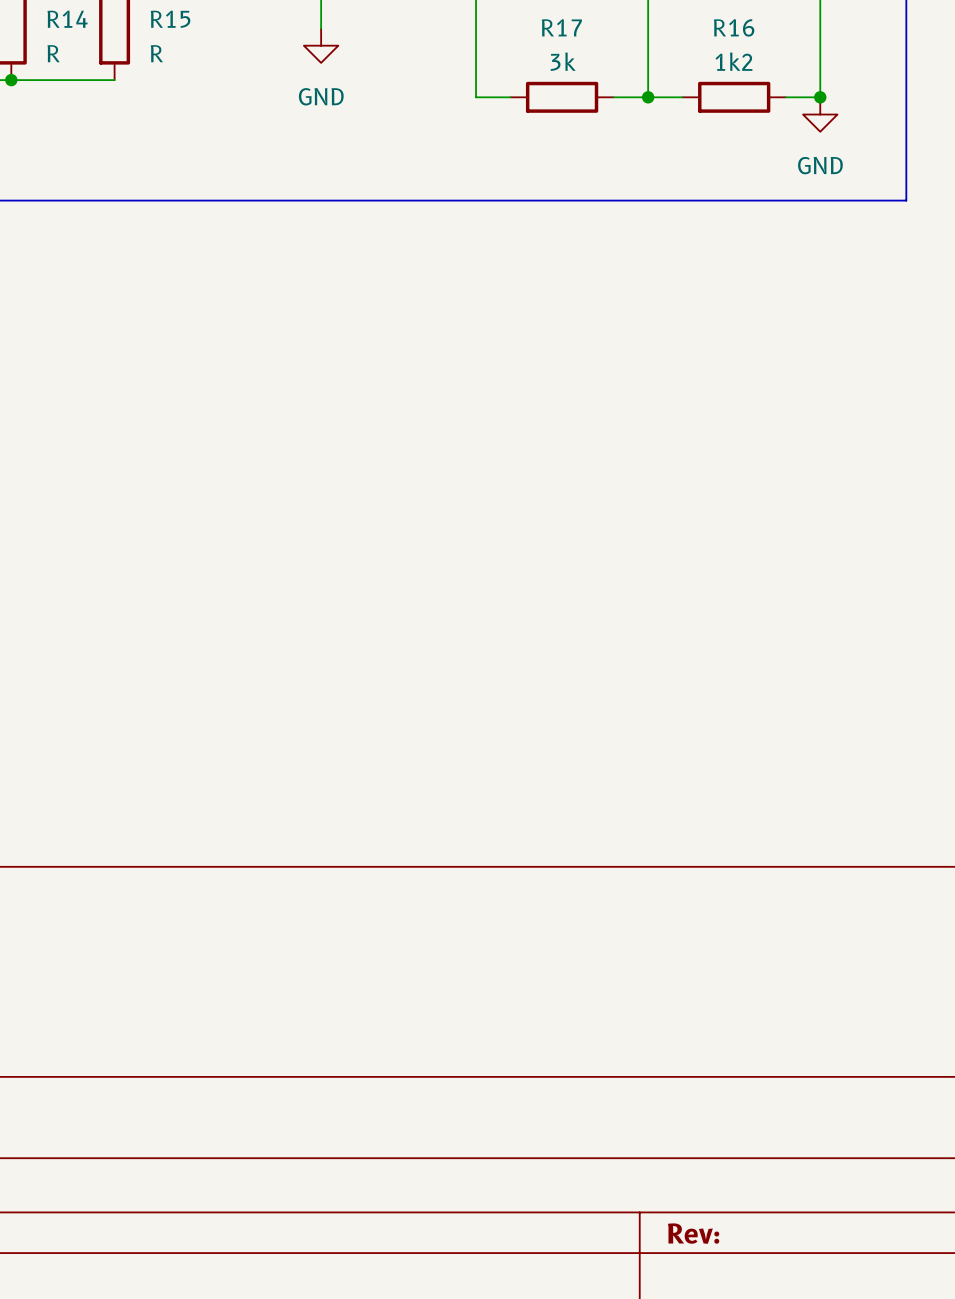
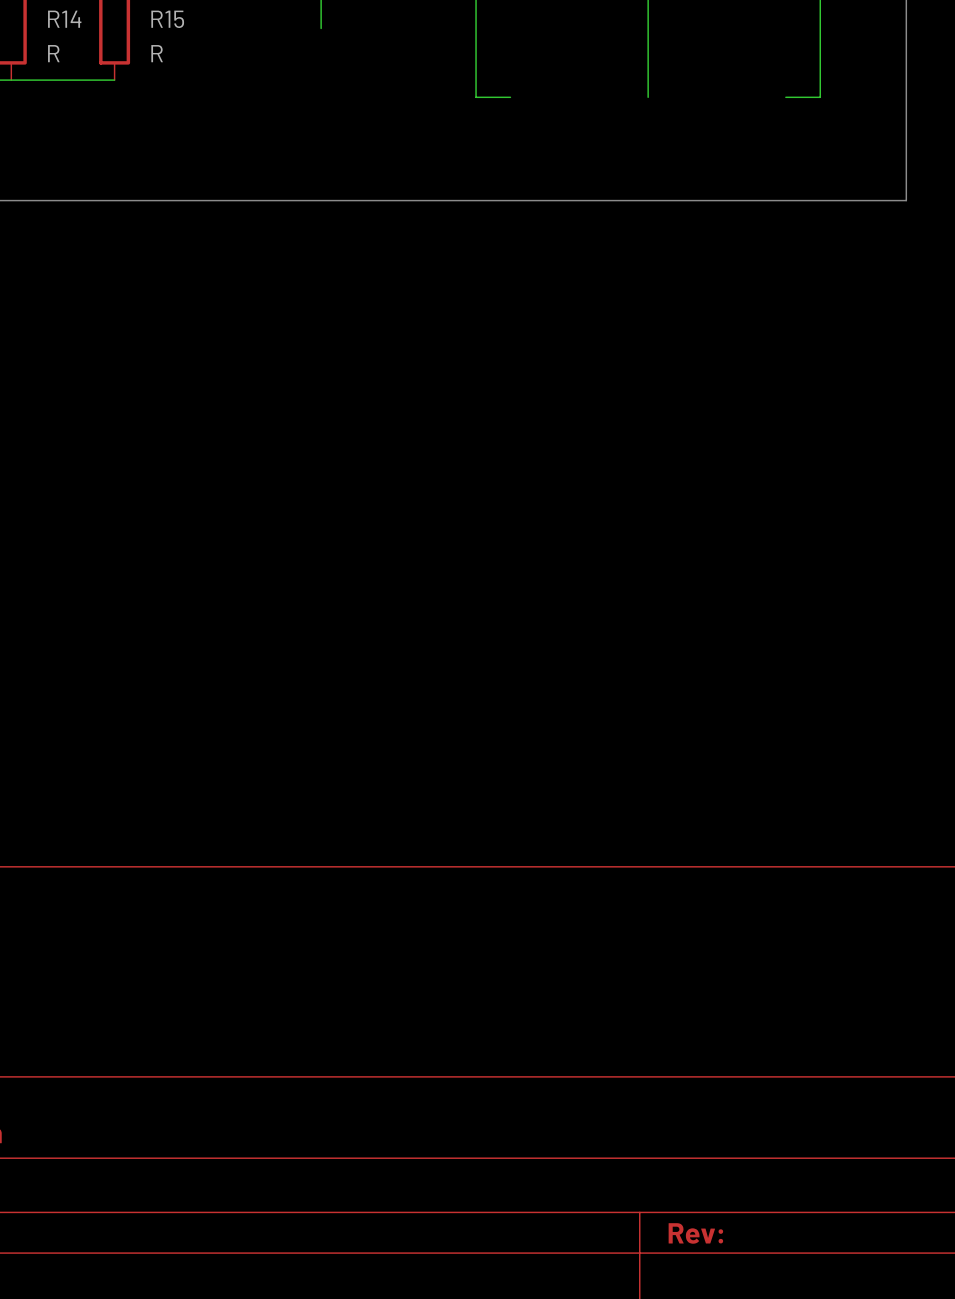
power symbol: GND (321, 45) -> none
junction: (11, 80) -> none
R17: 3k (562, 97) -> none
wire: (613, 97) (682, 97) -> none
junction: (648, 97) -> none
R16: 1k2 (734, 97) -> none
junction: (820, 97) -> none
power symbol: GND (820, 114) -> none

